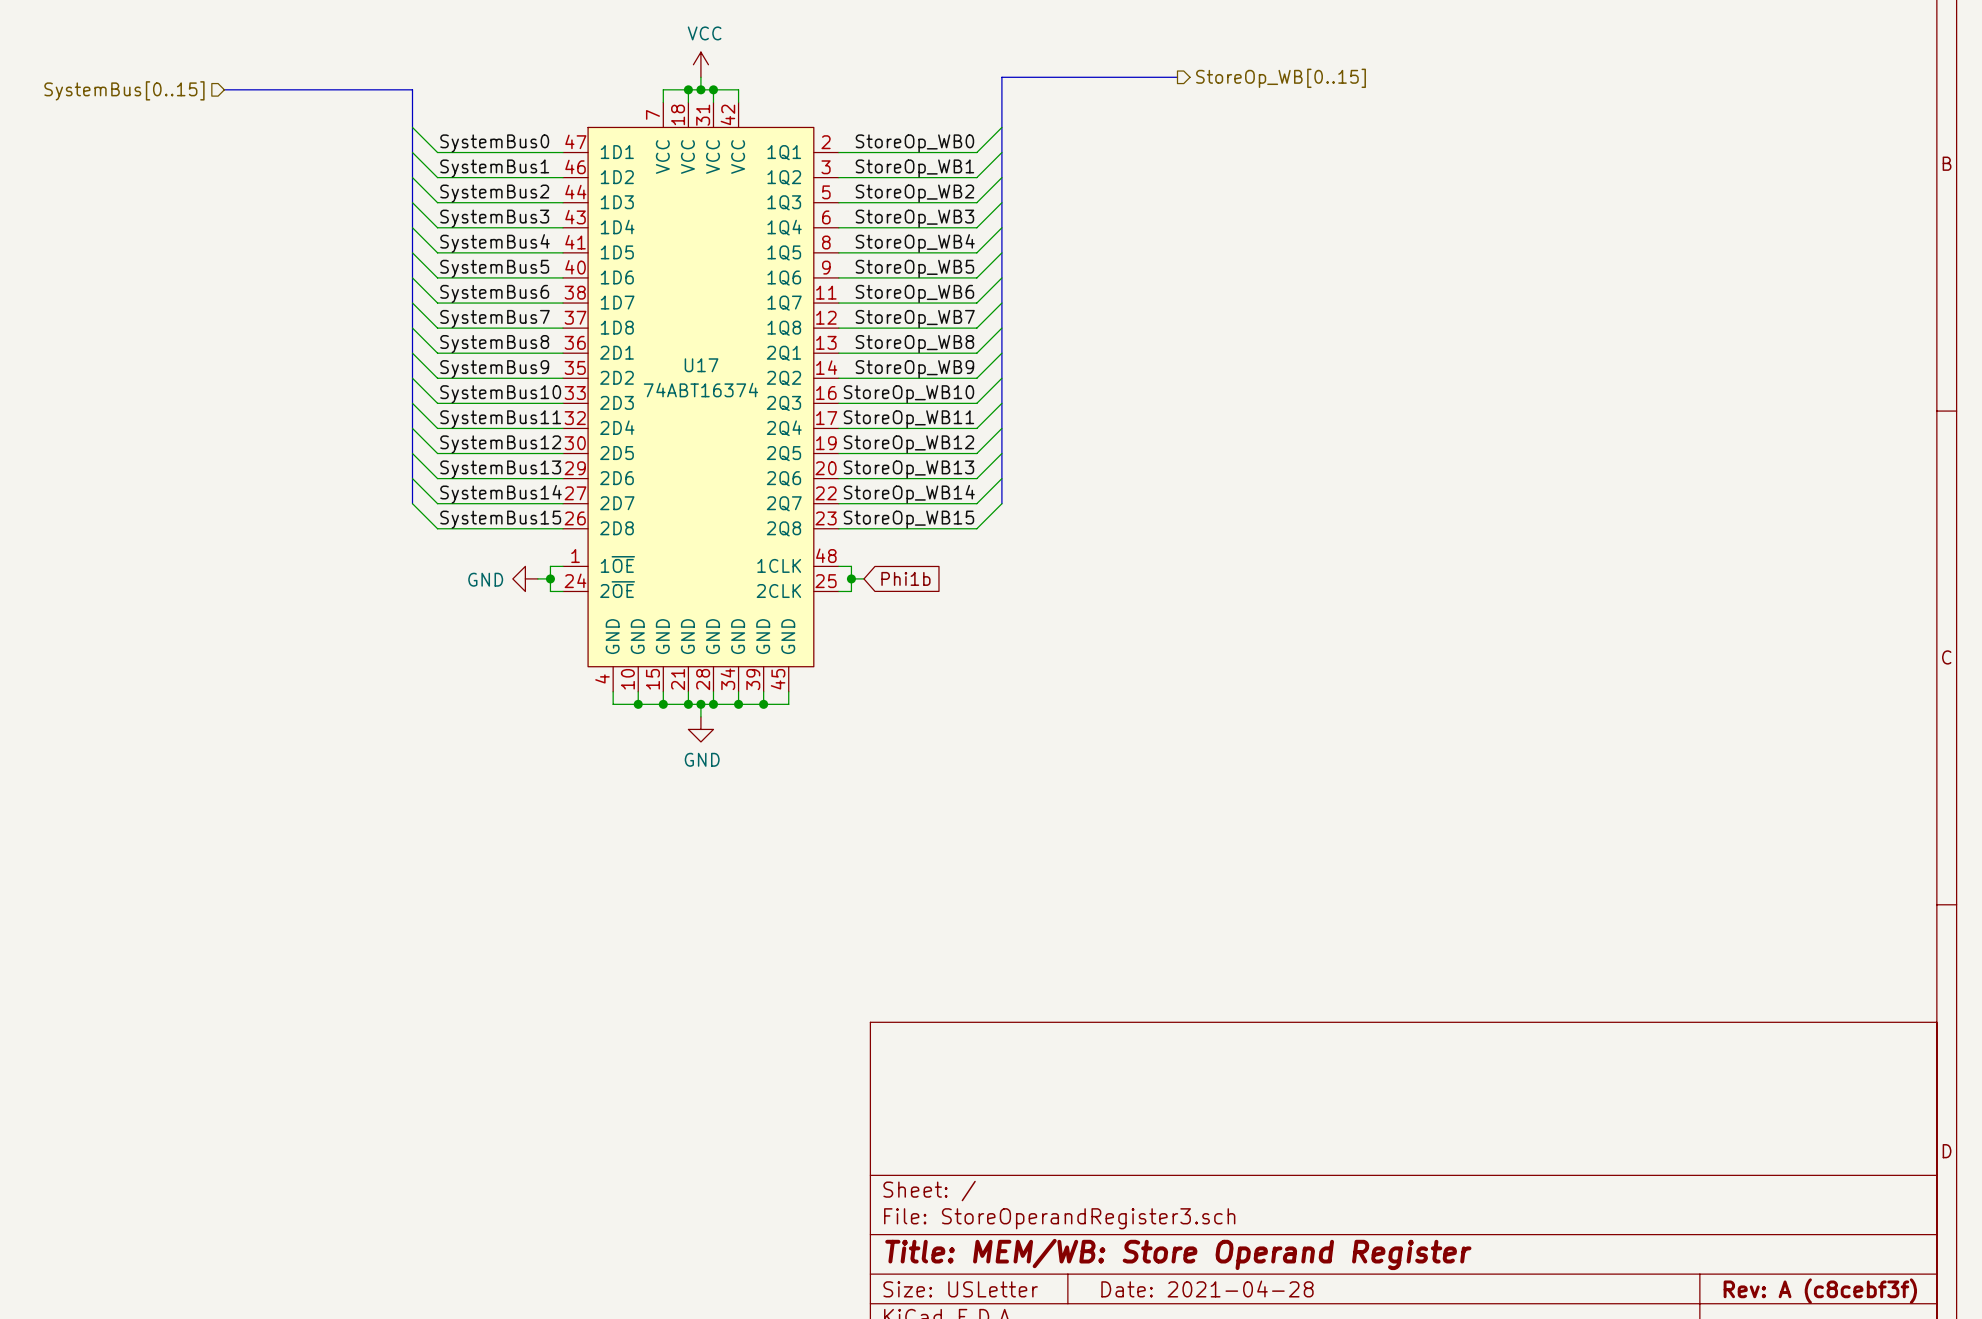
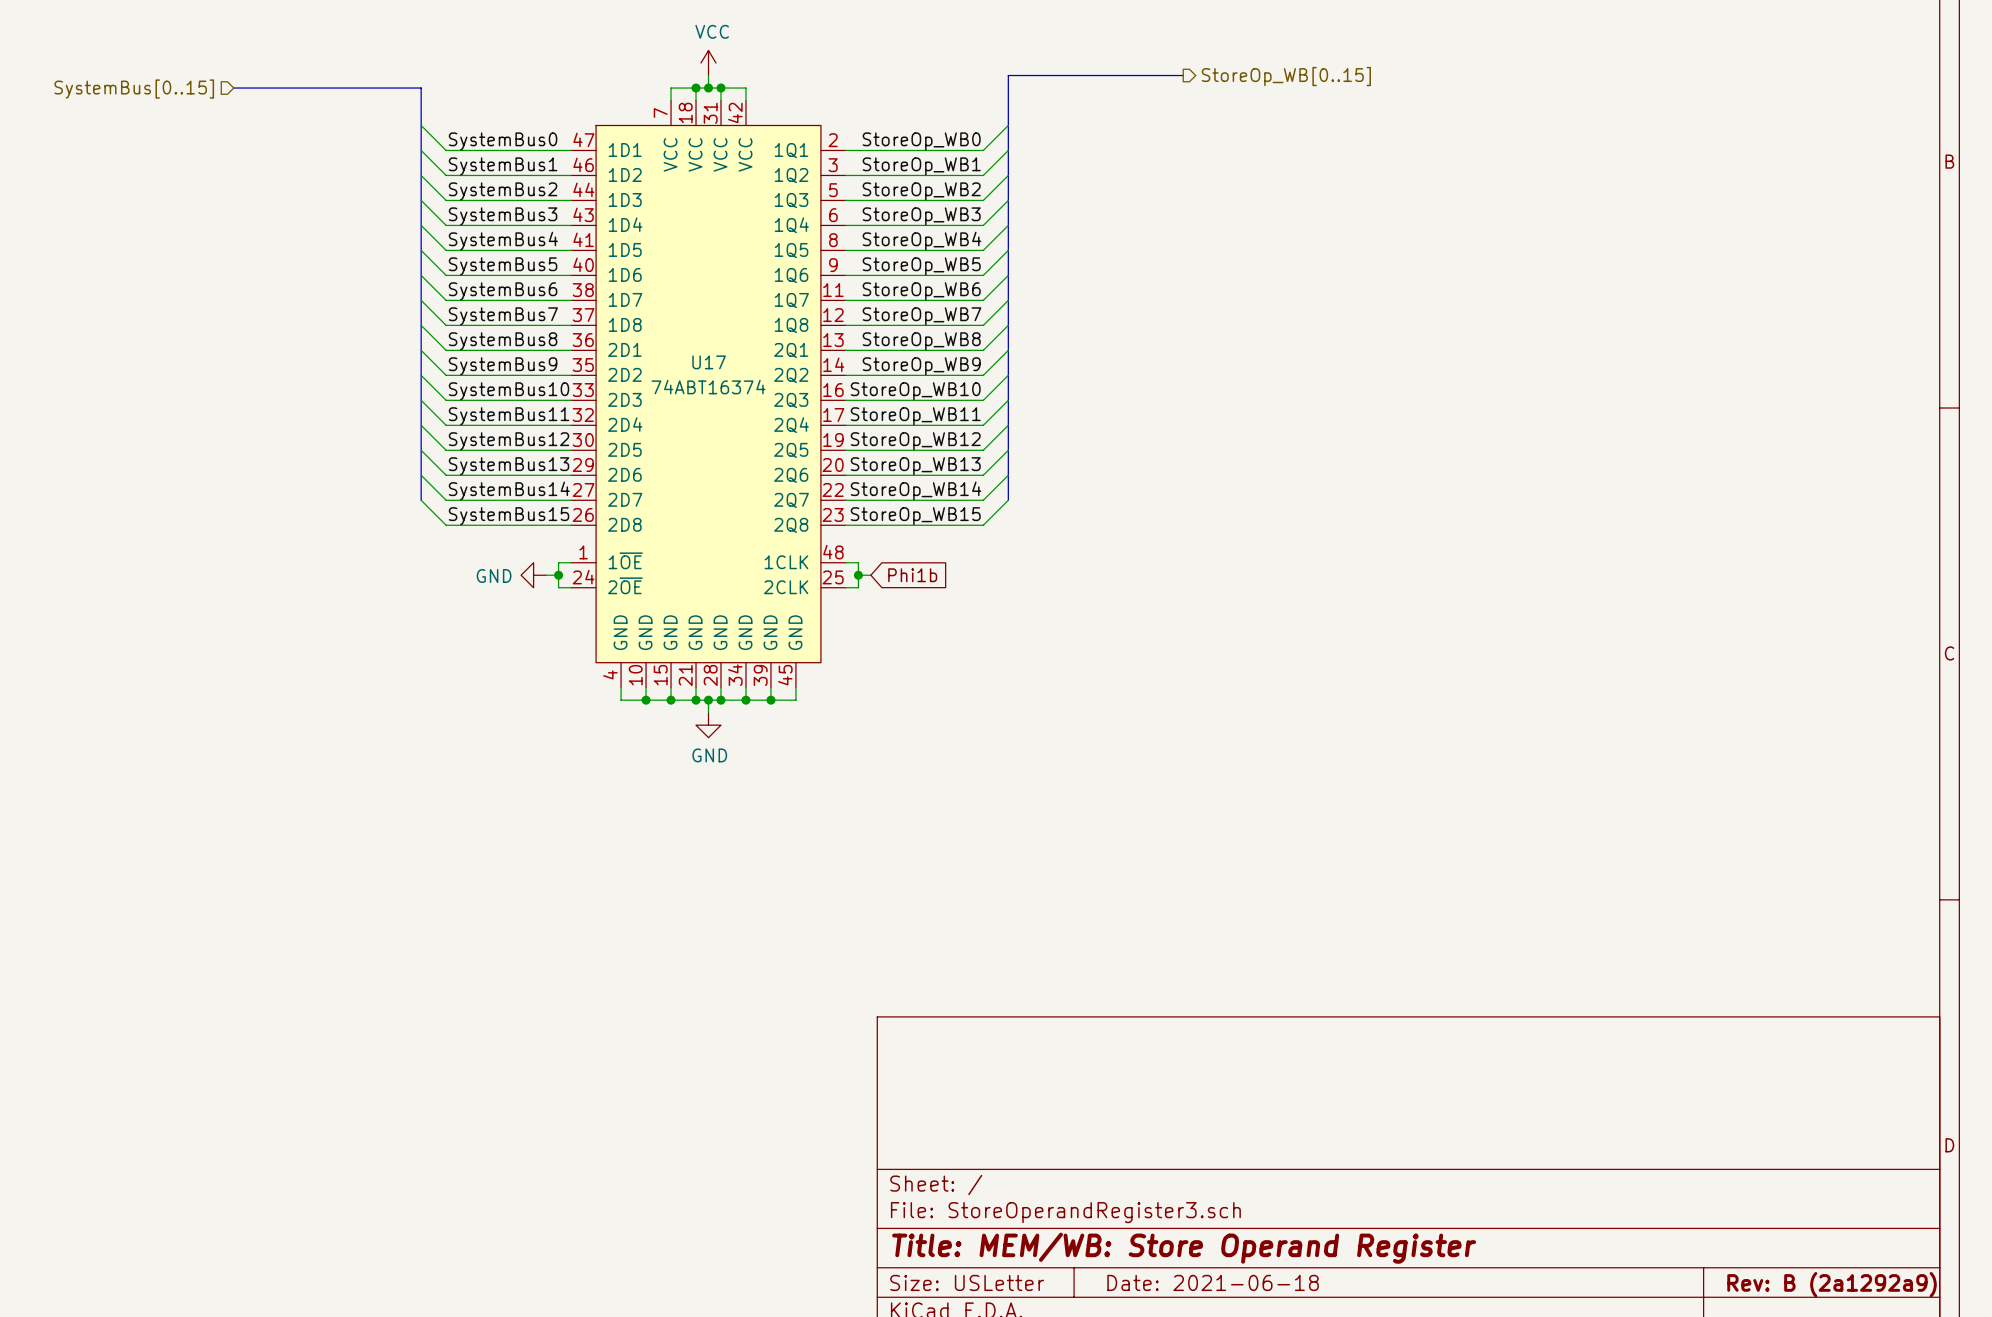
title block: Date: 2021-04-28 (1207, 1289) -> Date: 2021-06-18 (1213, 1282)
title block: Rev: A (c8cebf3f) (1820, 1291) -> Rev: B (2a1292a9) (1832, 1284)

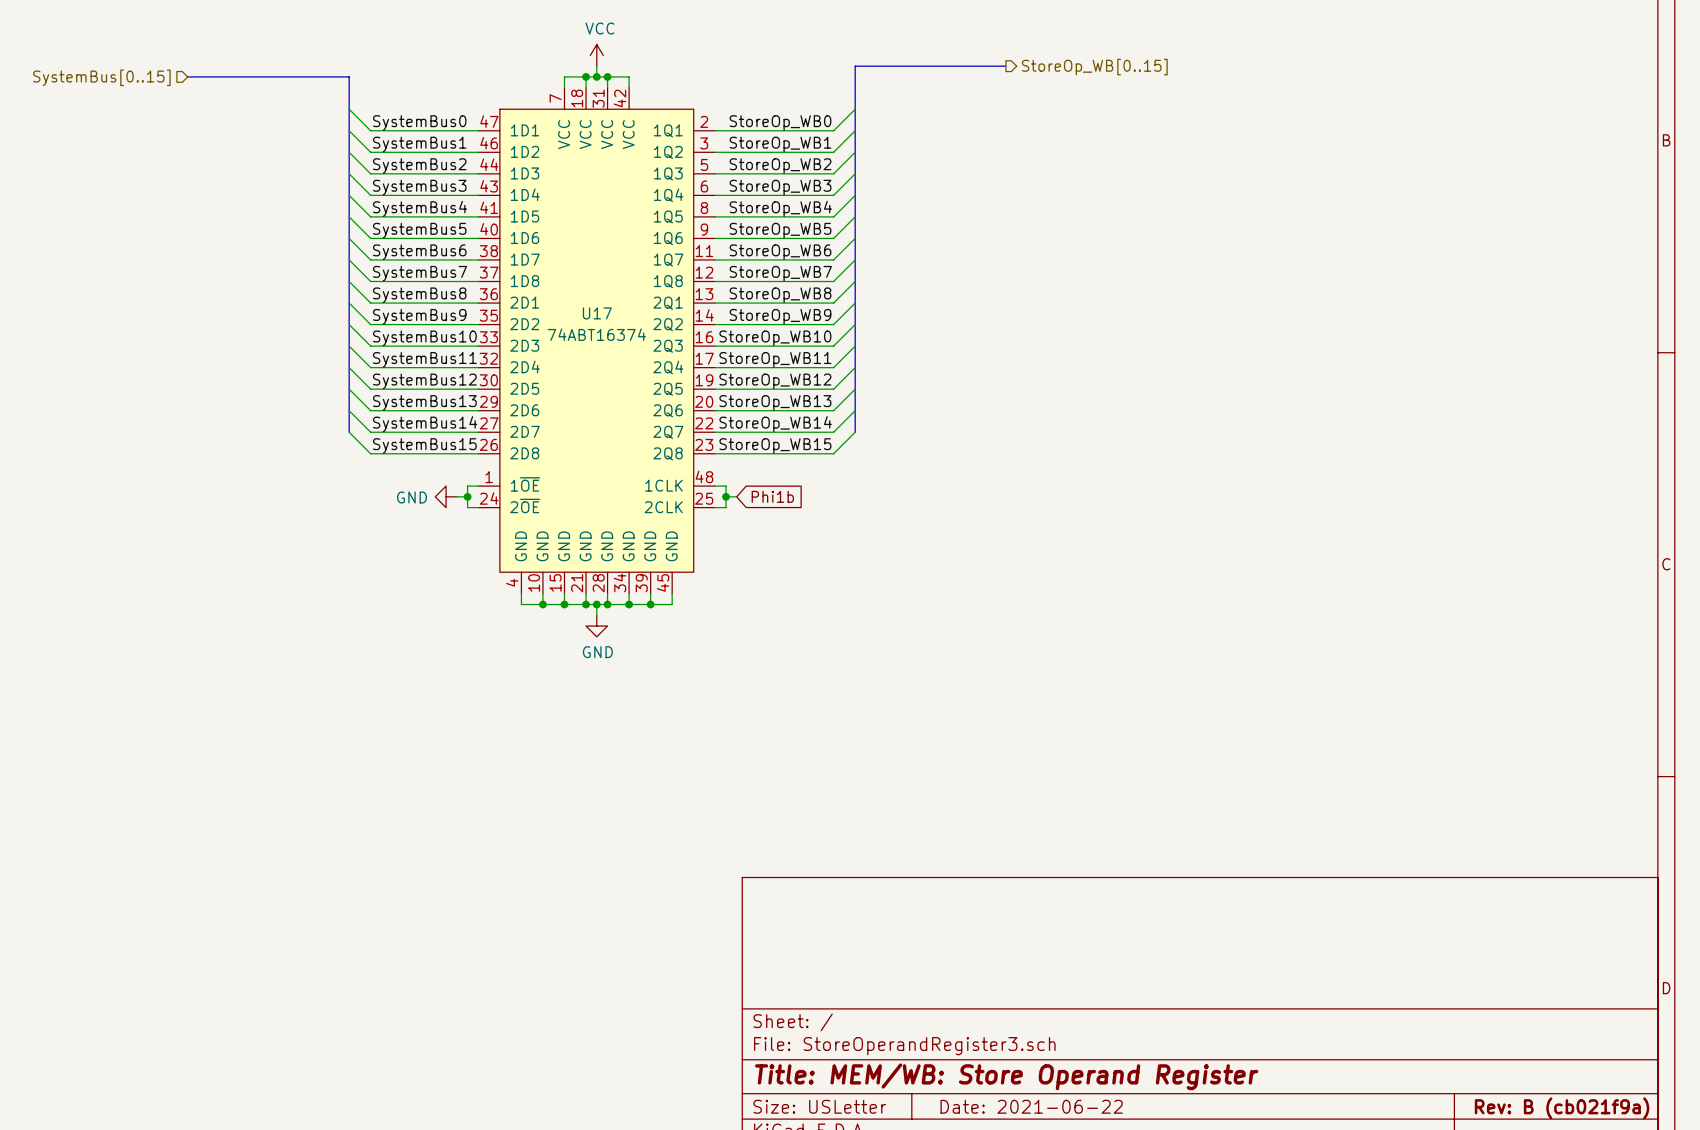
title block: Date: 2021-06-18 (1213, 1282) -> Date: 2021-06-22 (1031, 1106)
title block: Rev: B (2a1292a9) (1832, 1284) -> Rev: B (cb021f9a) (1562, 1108)

